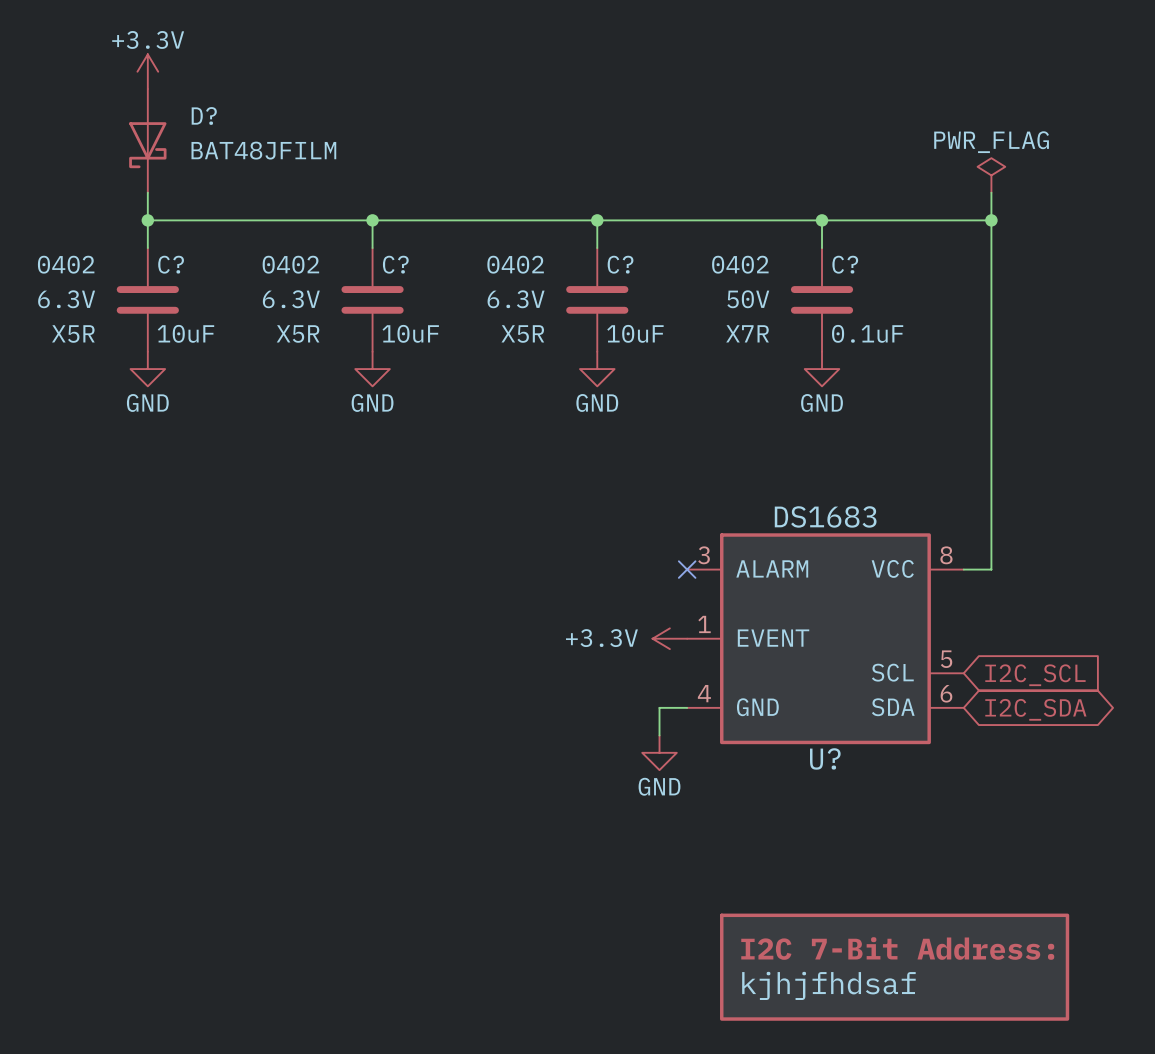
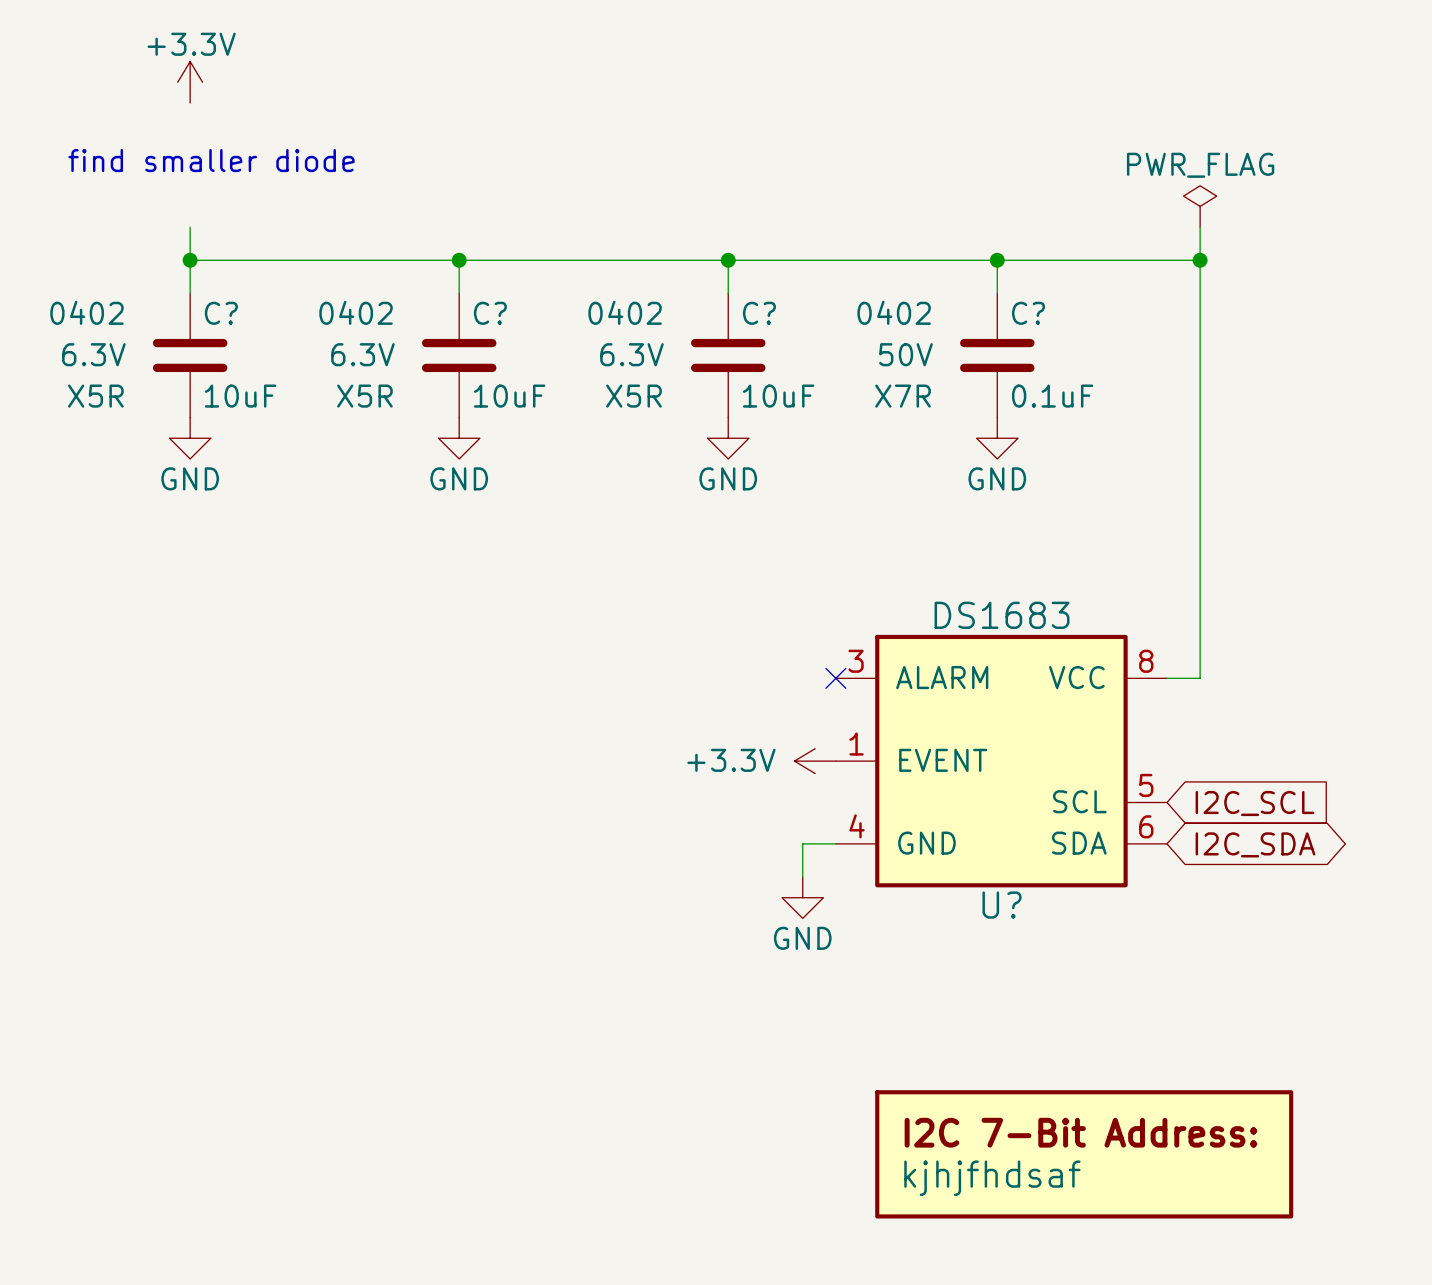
text: none -> find smaller diode (211, 160)
D?: BAT48JFILM (147, 140) -> none

